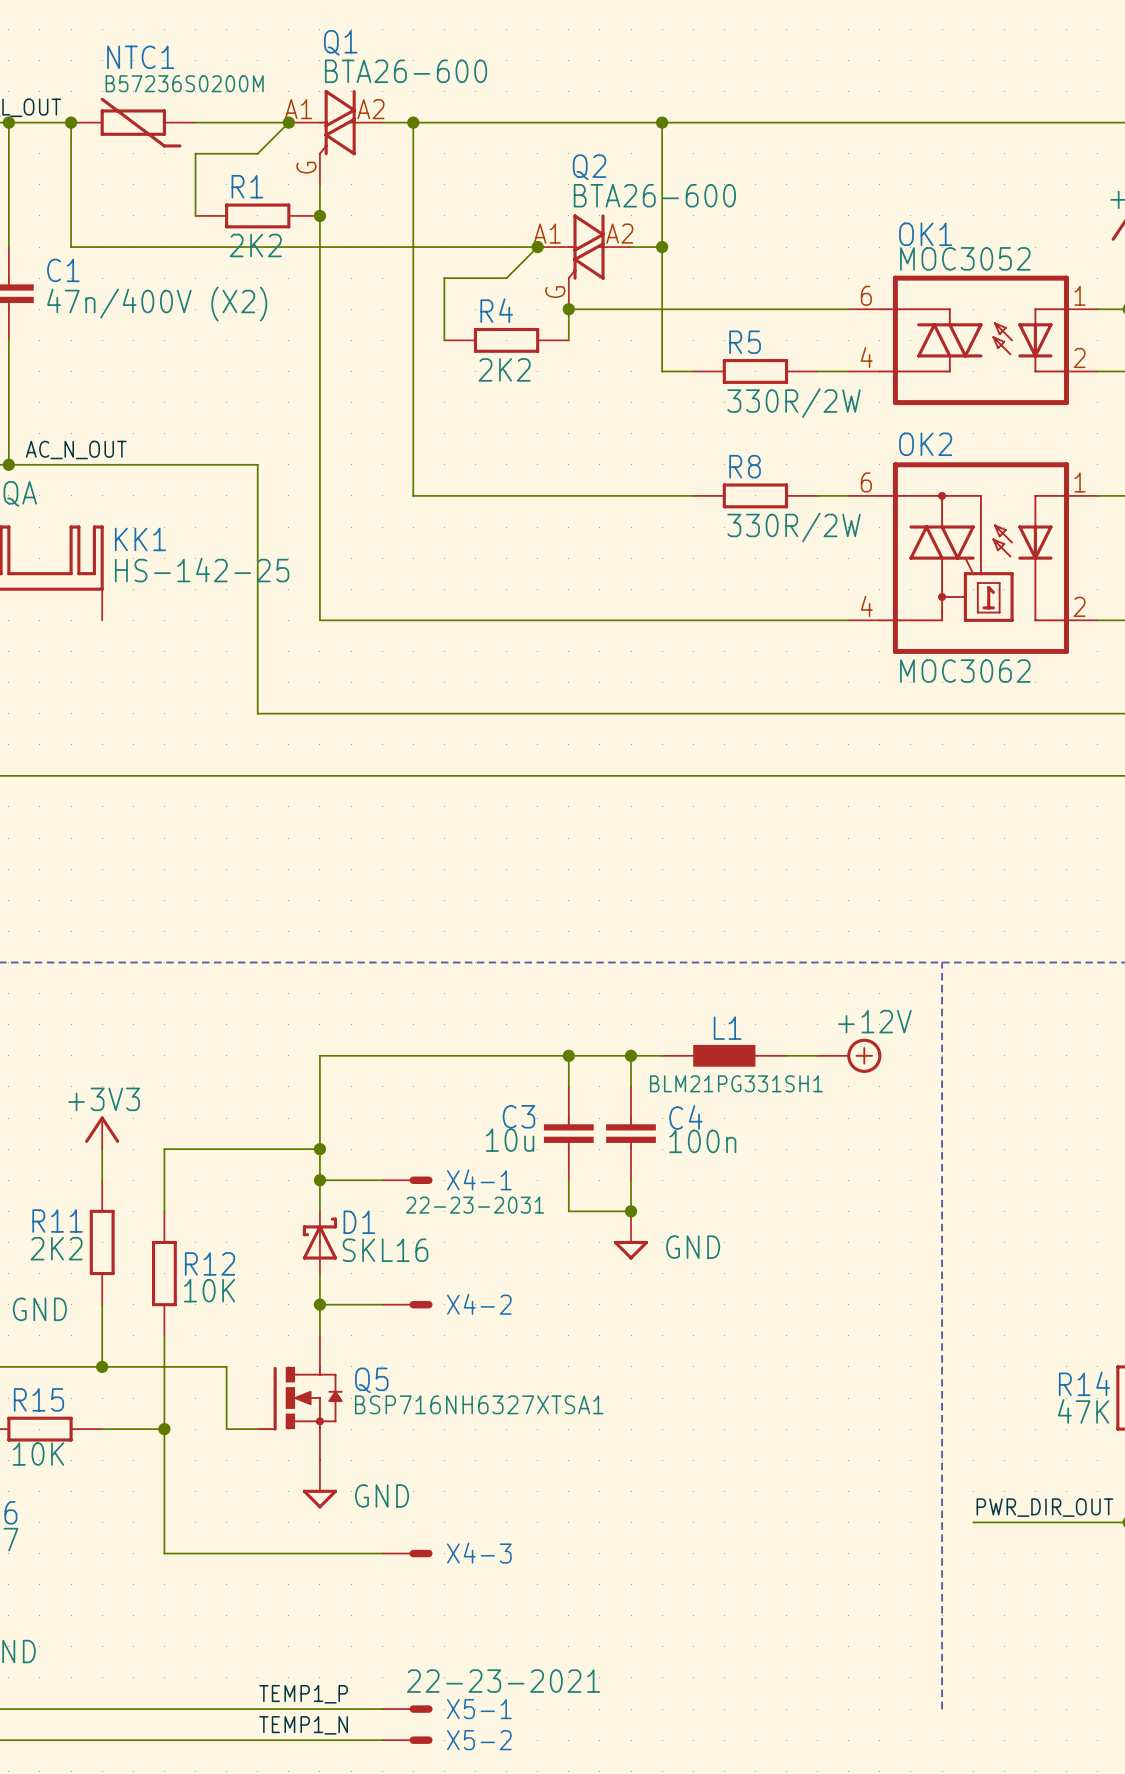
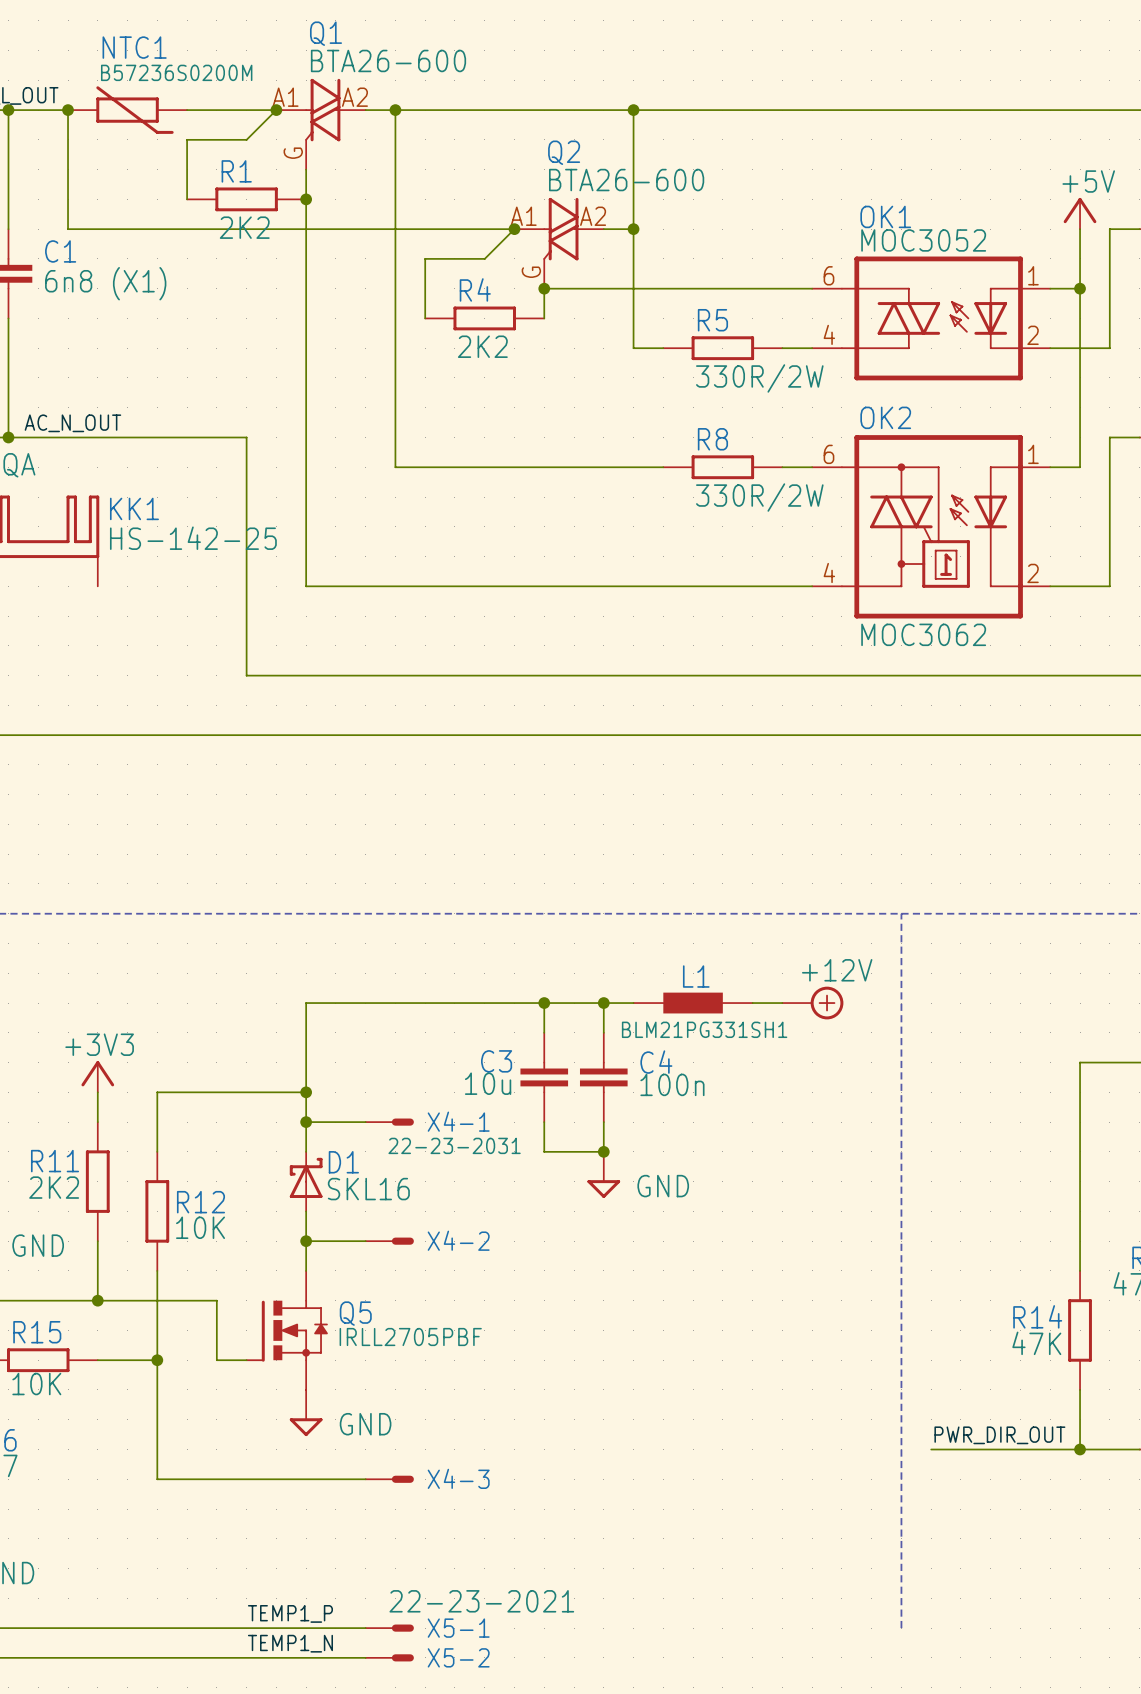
C1 value: 47n/400V (X2) (157, 304) -> 6n8 (X1) (105, 283)
Q5 value: BSP716NH6327XTSA1 (479, 1404) -> IRLL2705PBF (410, 1337)

